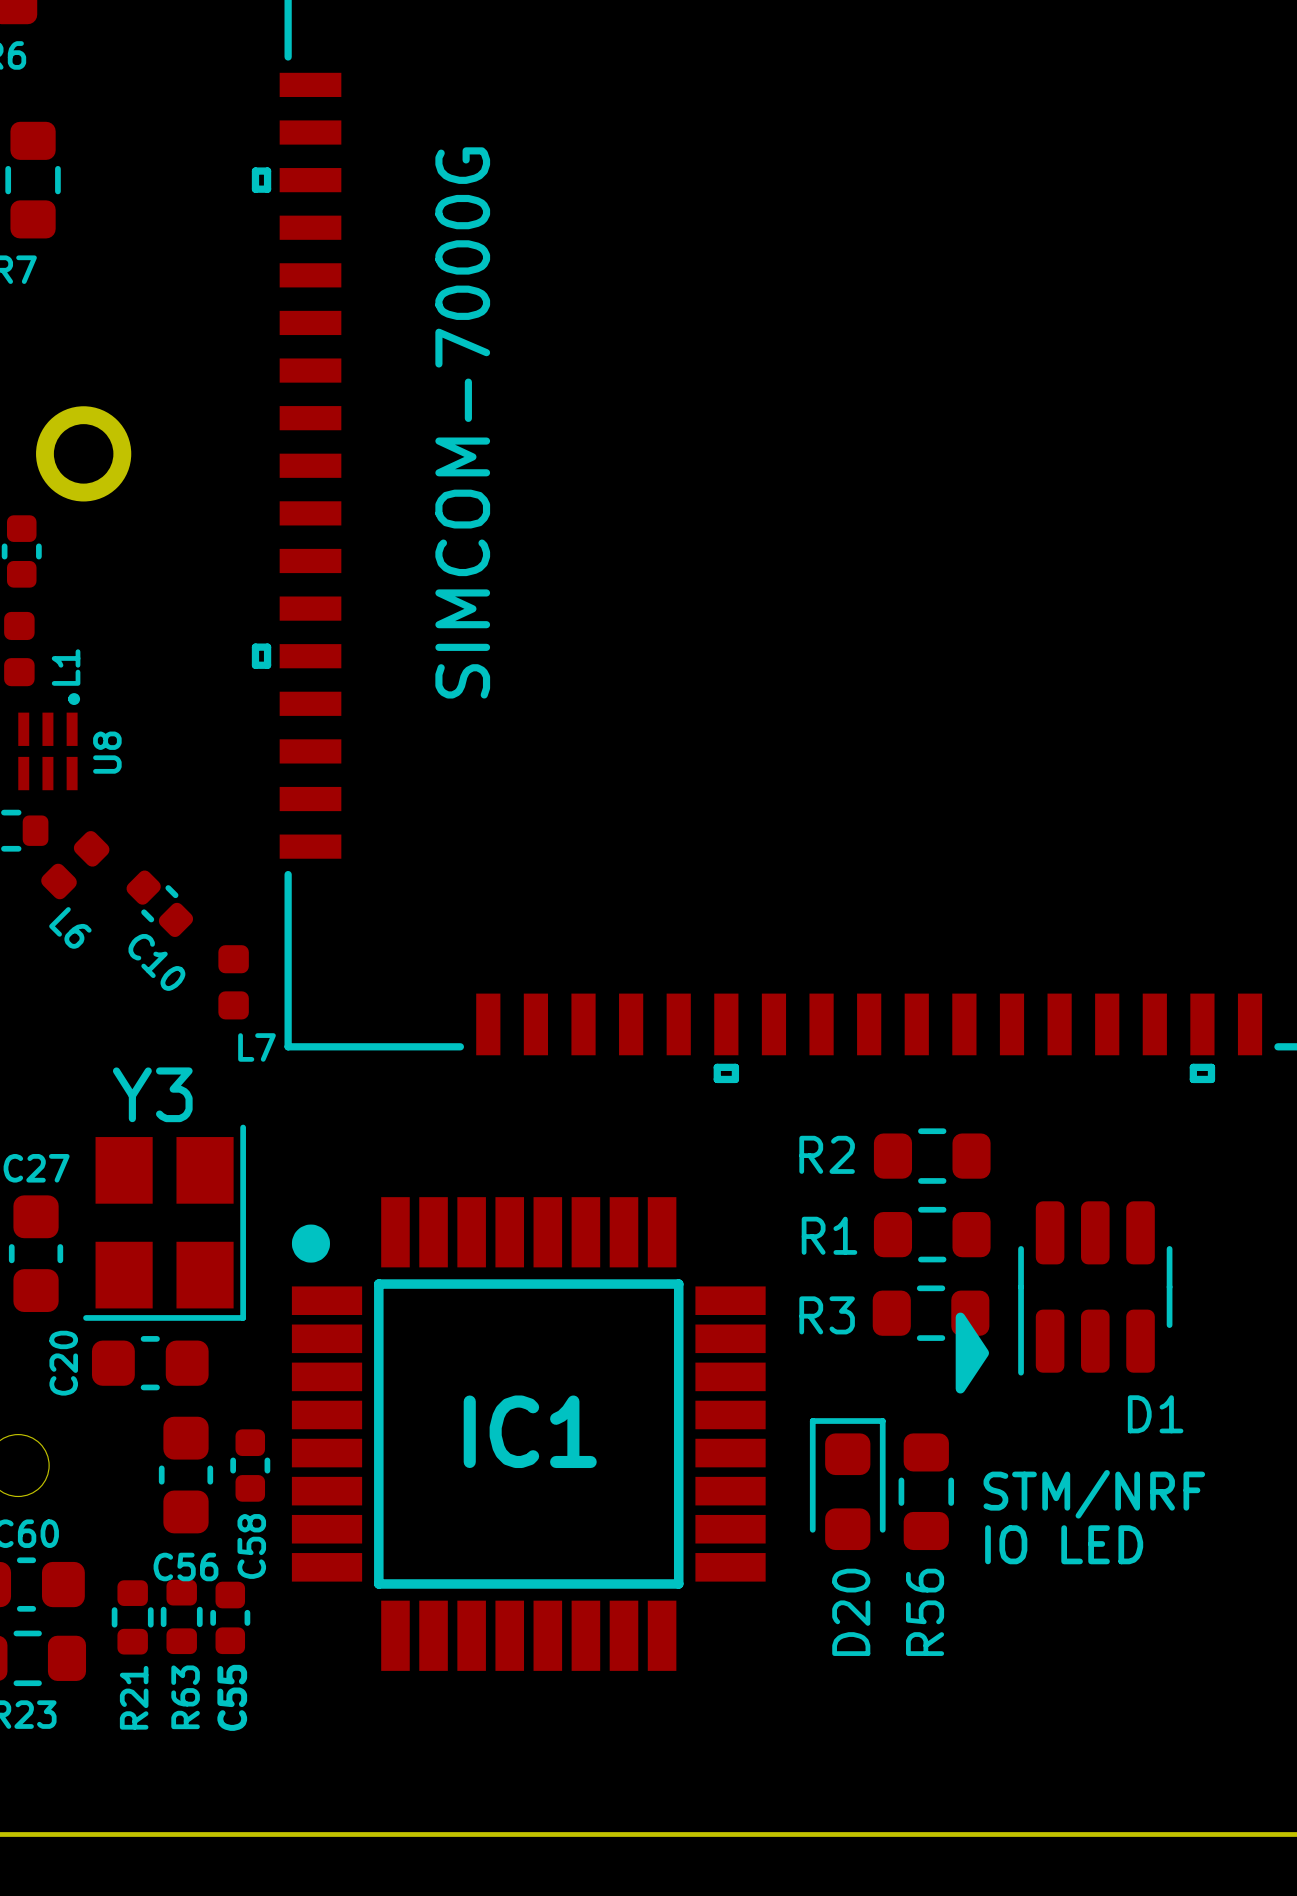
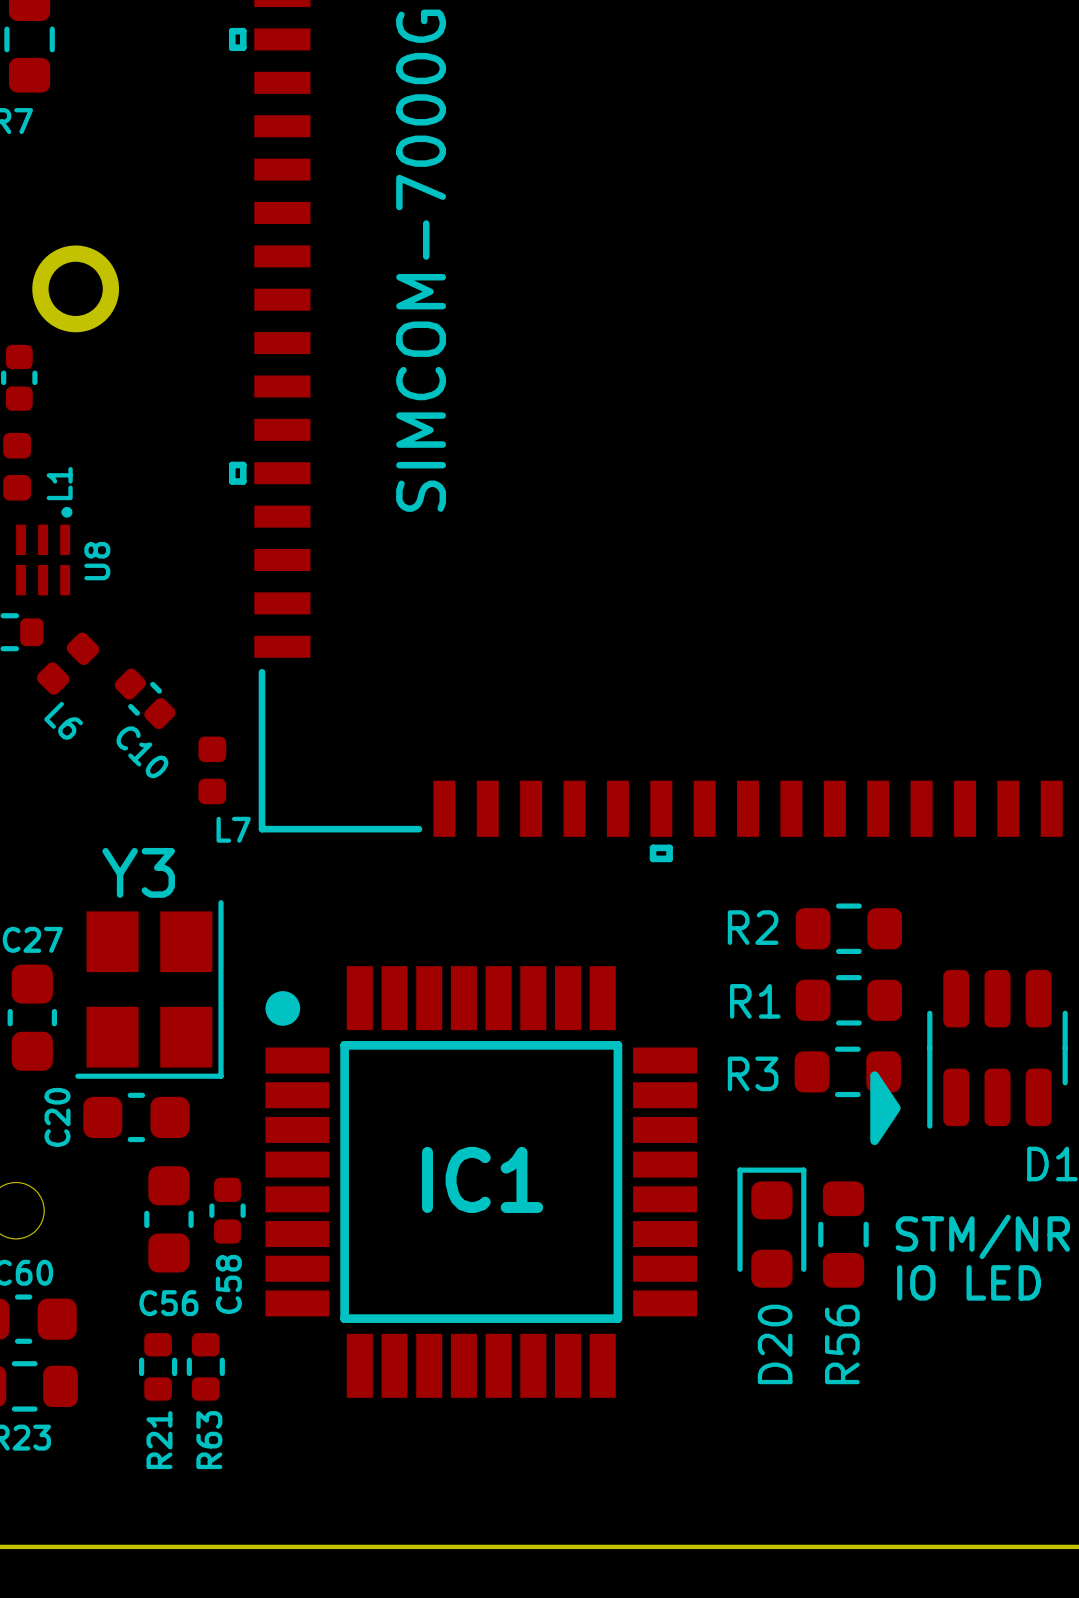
R63 position: (181, 1616) -> (205, 1366)
R21 position: (132, 1617) -> (158, 1366)
C55: (230, 1617) -> none

